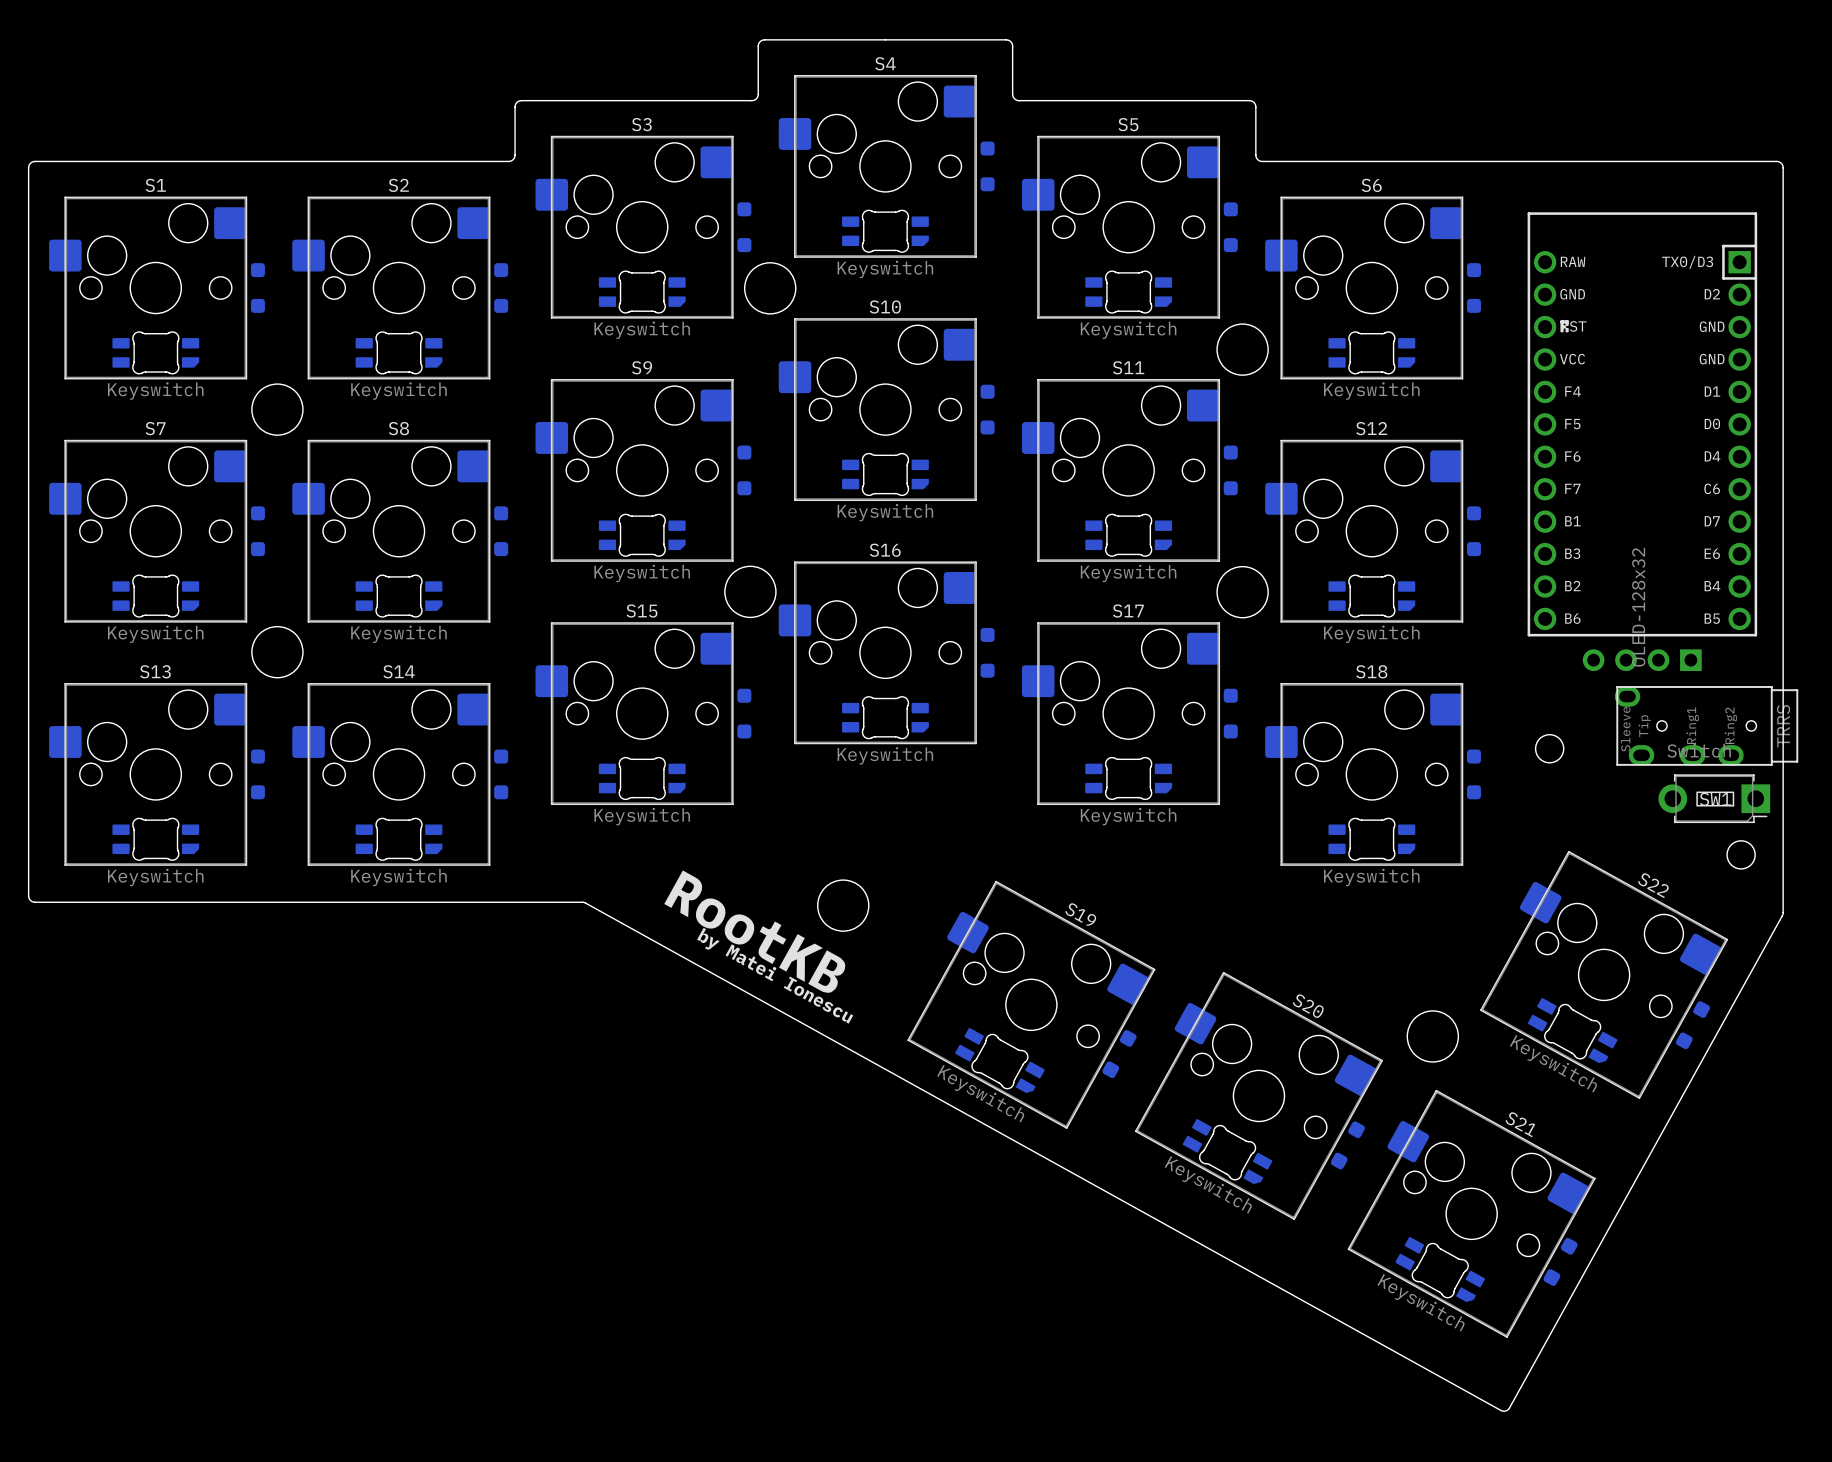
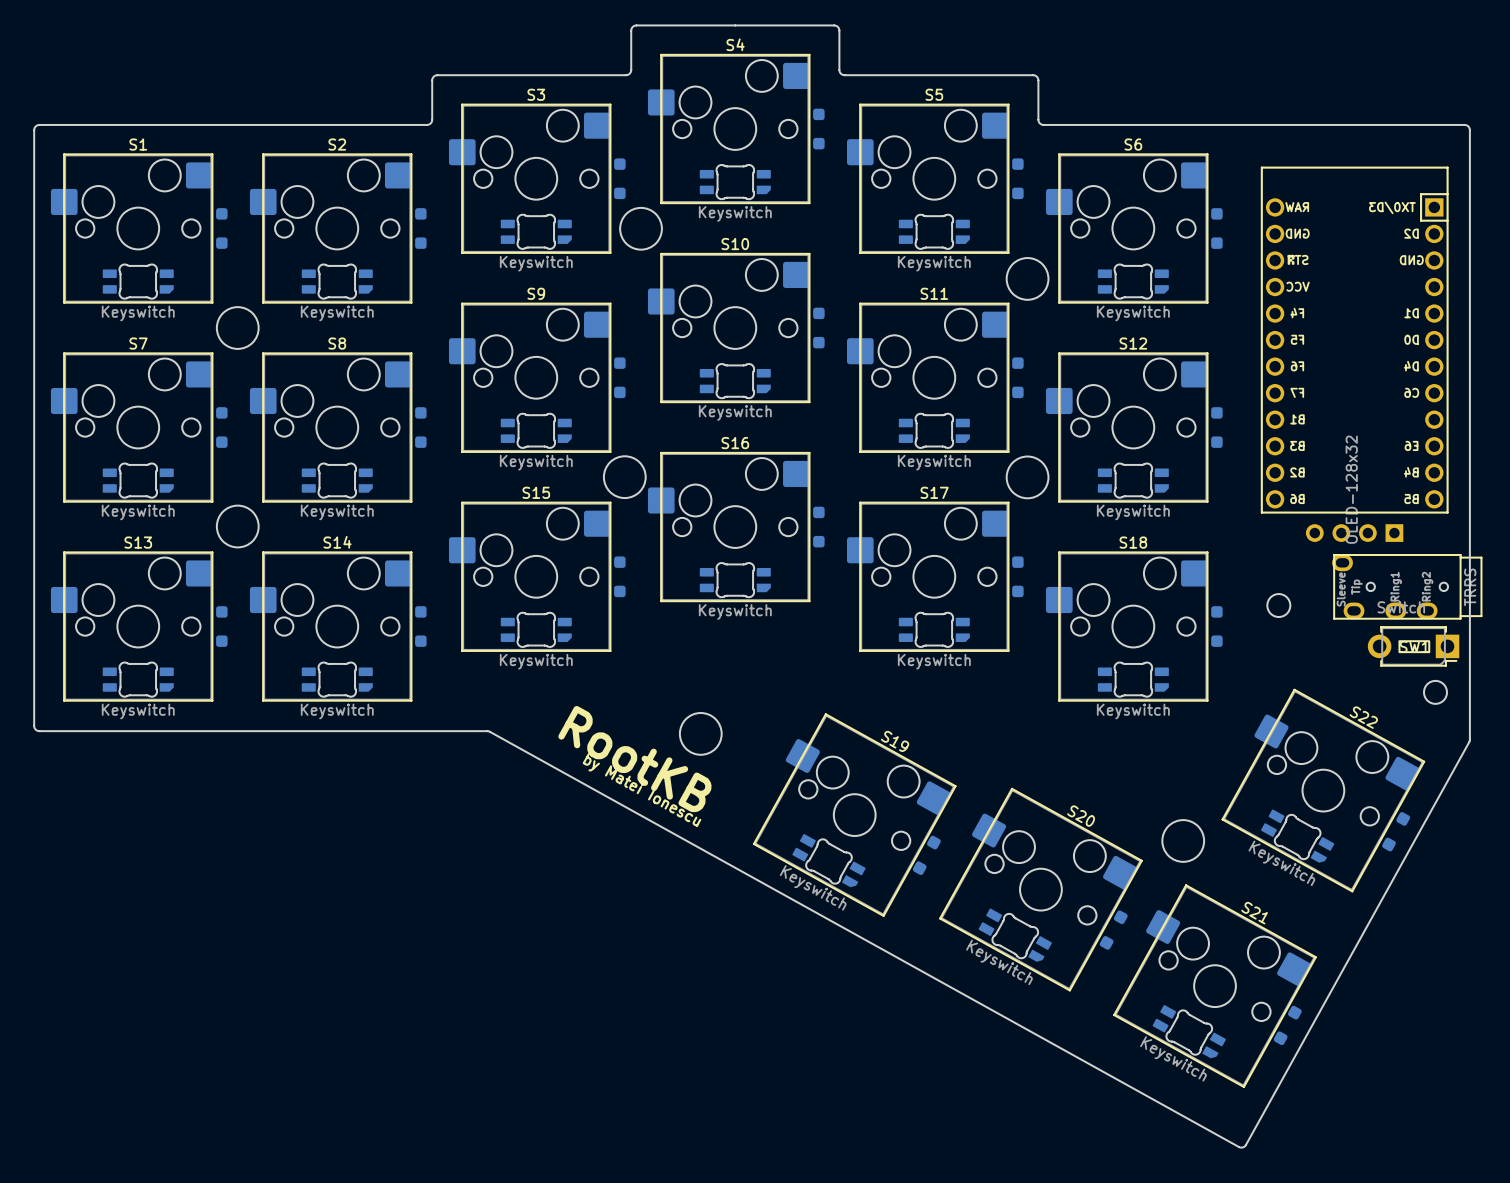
part footprint: [1527, 212, 1758, 637] -> [1260, 166, 1449, 514]

